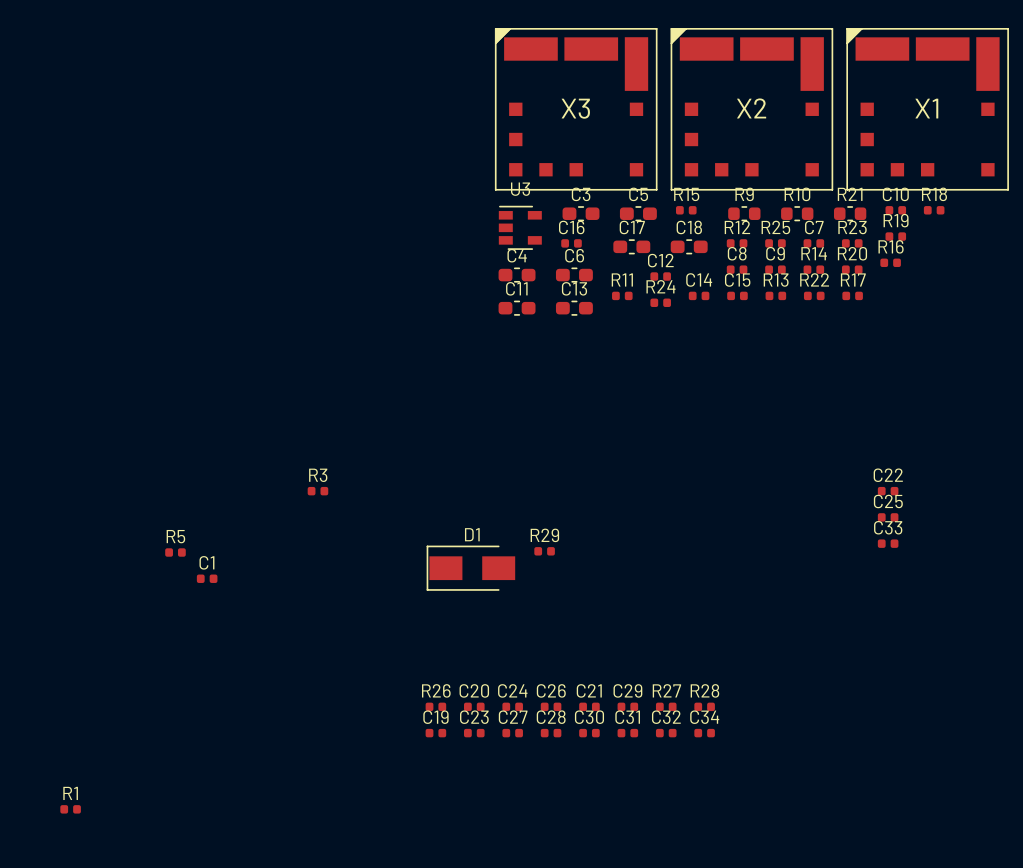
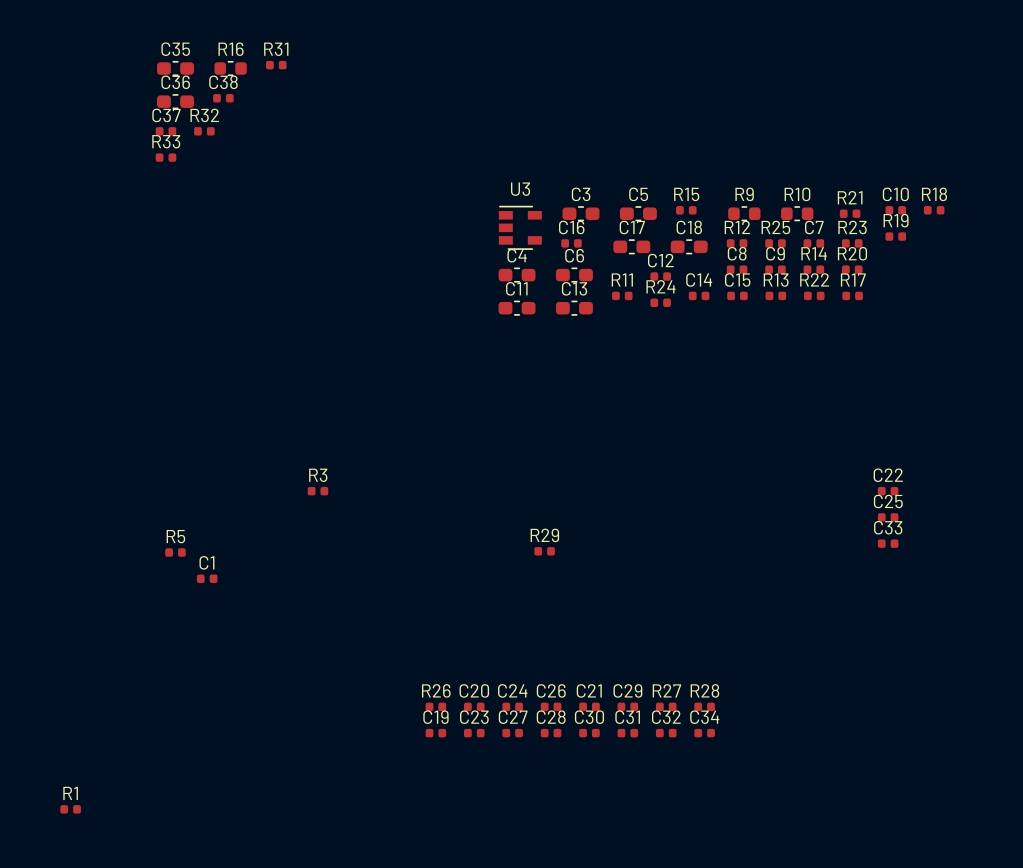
R31: none -> (276, 65)
C35: none -> (175, 68)
C38: none -> (223, 98)
C36: none -> (175, 101)
X3: (576, 109) -> none
X2: (751, 109) -> none
X1: (927, 109) -> none
C37: none -> (165, 131)
R32: none -> (204, 131)
R33: none -> (165, 157)
R21 footprint: [833, 206, 867, 222] -> [839, 209, 861, 218]
R16 footprint: [880, 258, 901, 268] -> [214, 61, 247, 77]
D1: (470, 568) -> none

